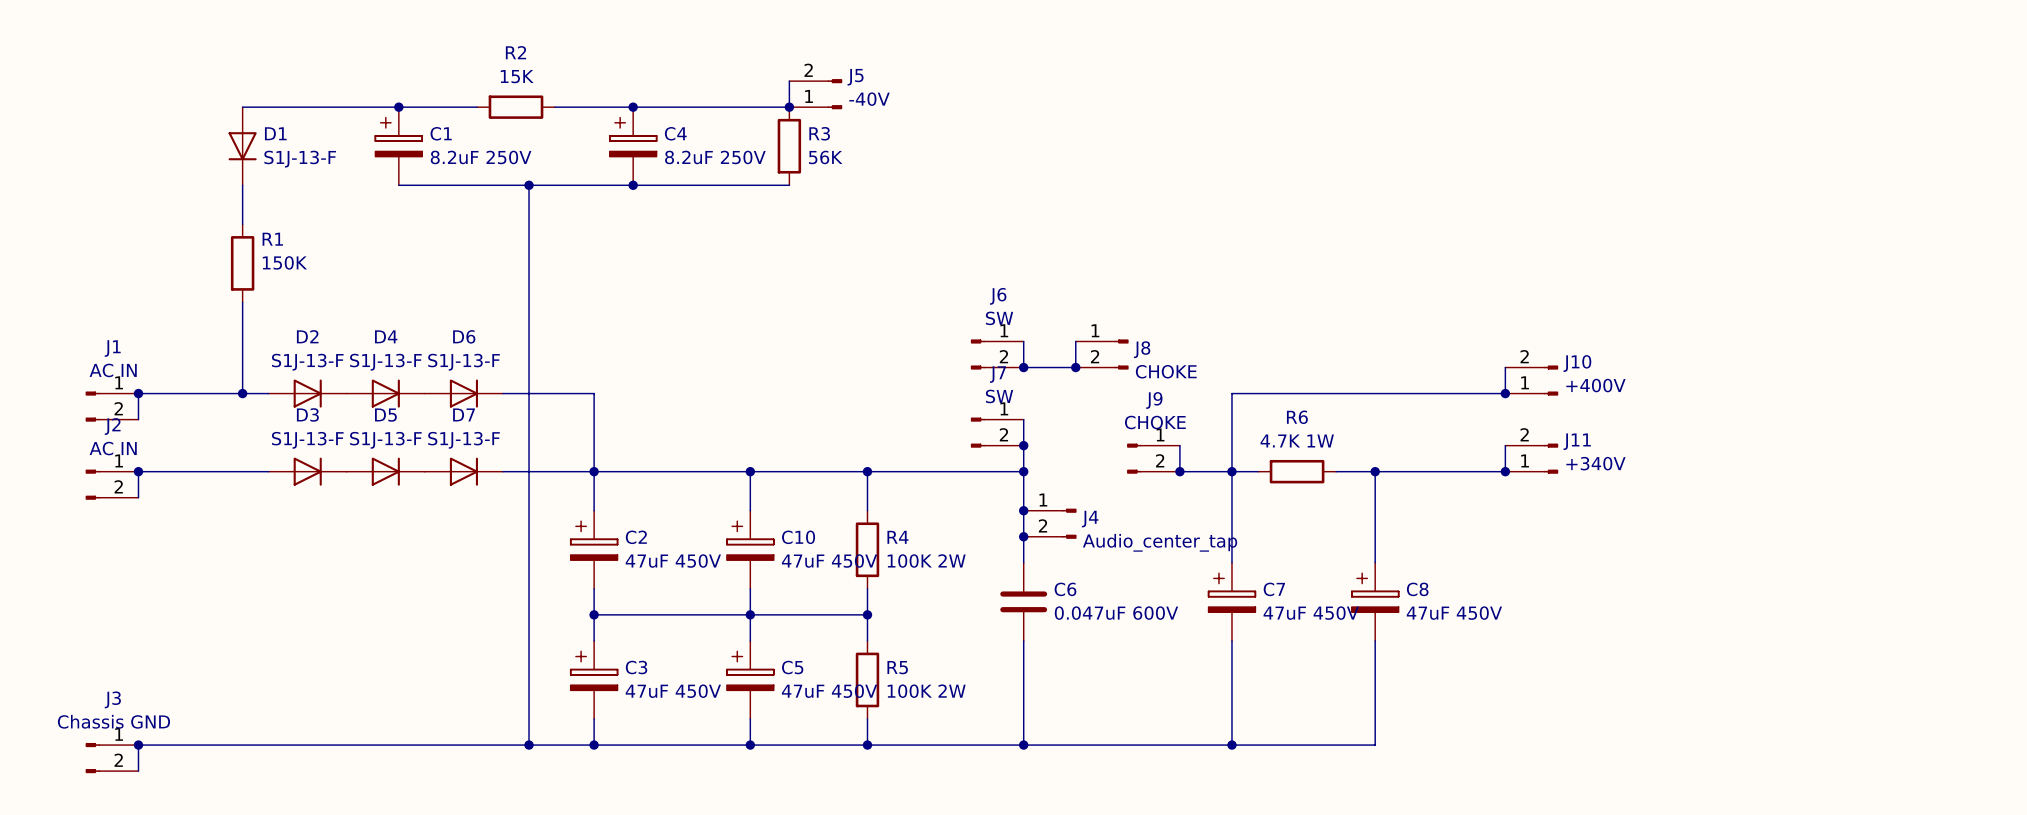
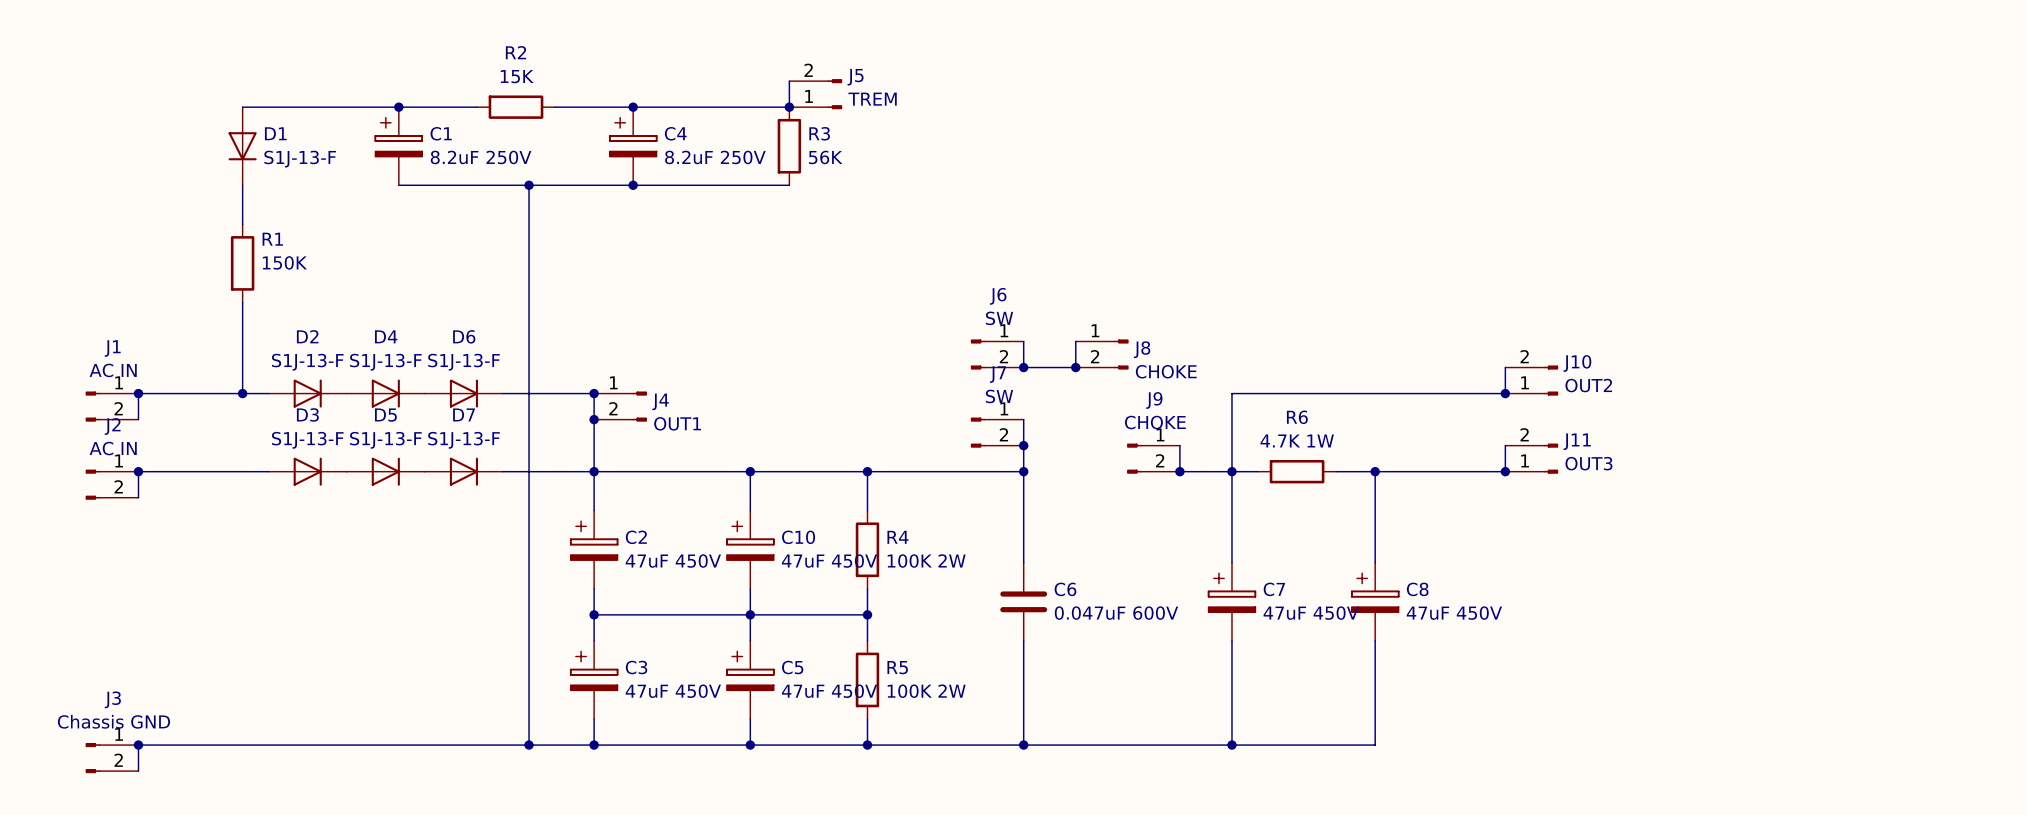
J5 value: -40V (869, 99) -> TREM (872, 99)
J10 value: +400V (1595, 385) -> OUT2 (1588, 385)
junction: none -> (594, 393)
junction: none -> (594, 419)
J11 value: +340V (1595, 463) -> OUT3 (1588, 463)
junction: (1023, 510) -> none
J4 position: (1050, 523) -> (620, 406)
junction: (1023, 536) -> none
J4 value: Audio_center_tap (1160, 542) -> OUT1 (677, 423)

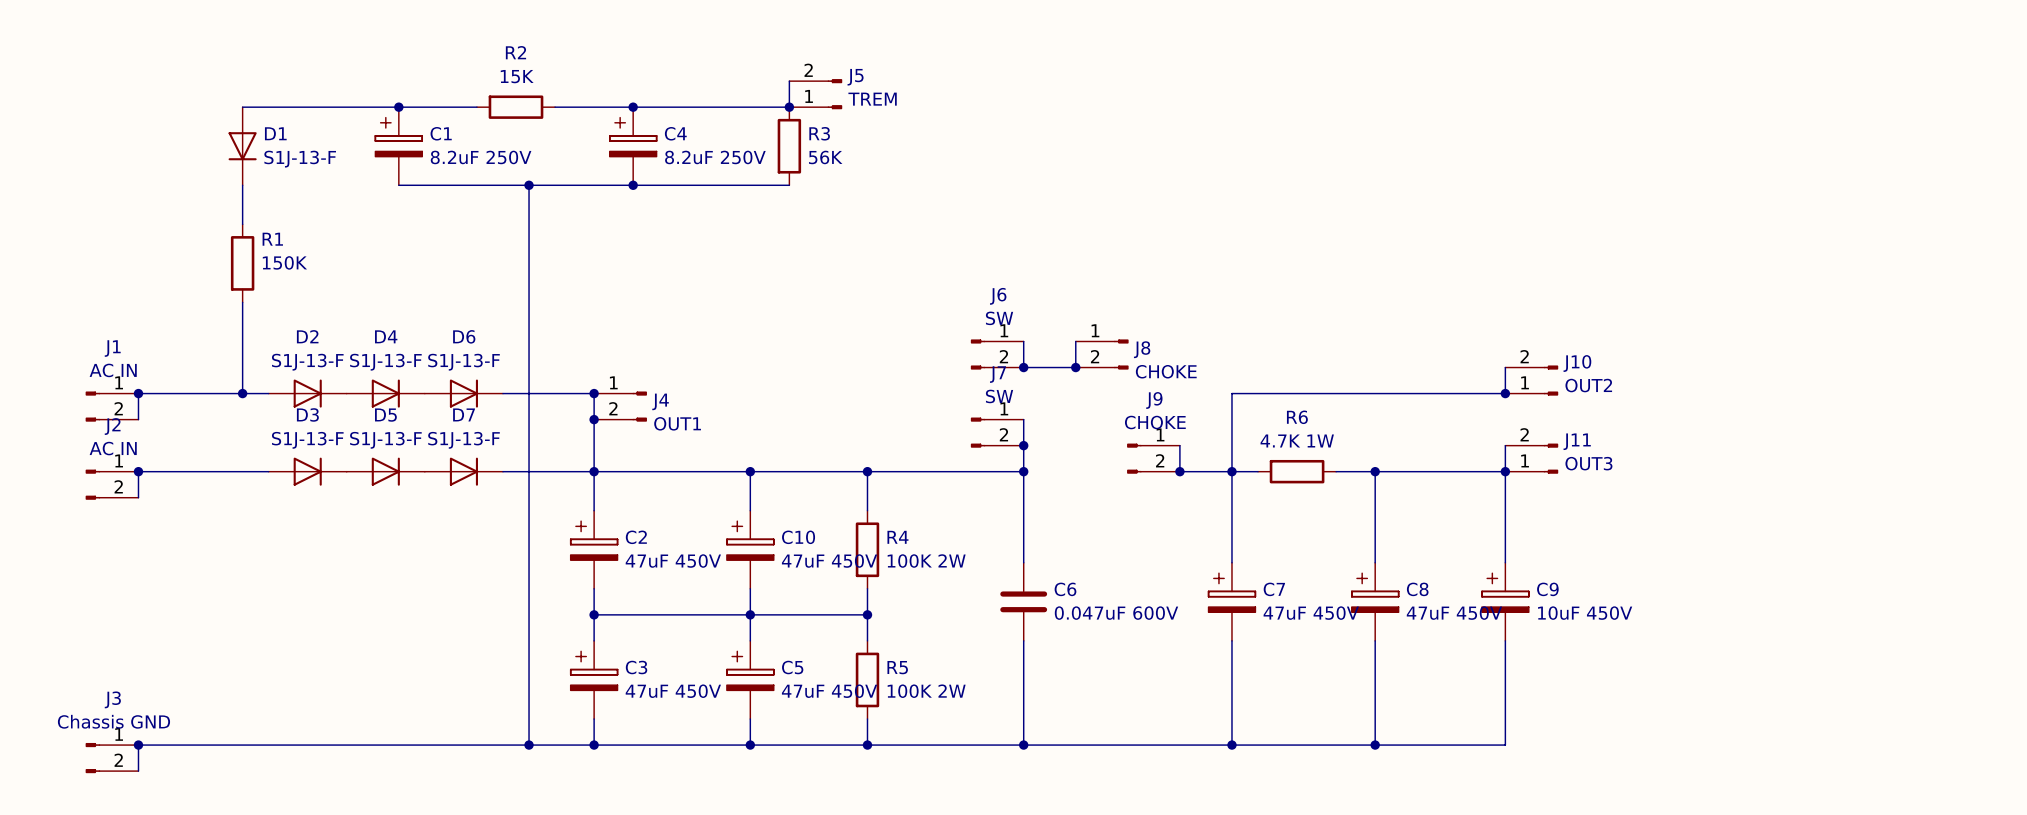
wire: none -> (1505, 471) (1505, 562)
C9: none -> 10uF 450V (1505, 601)
wire: none -> (1505, 640) (1505, 745) (1375, 745)
junction: none -> (1375, 745)

